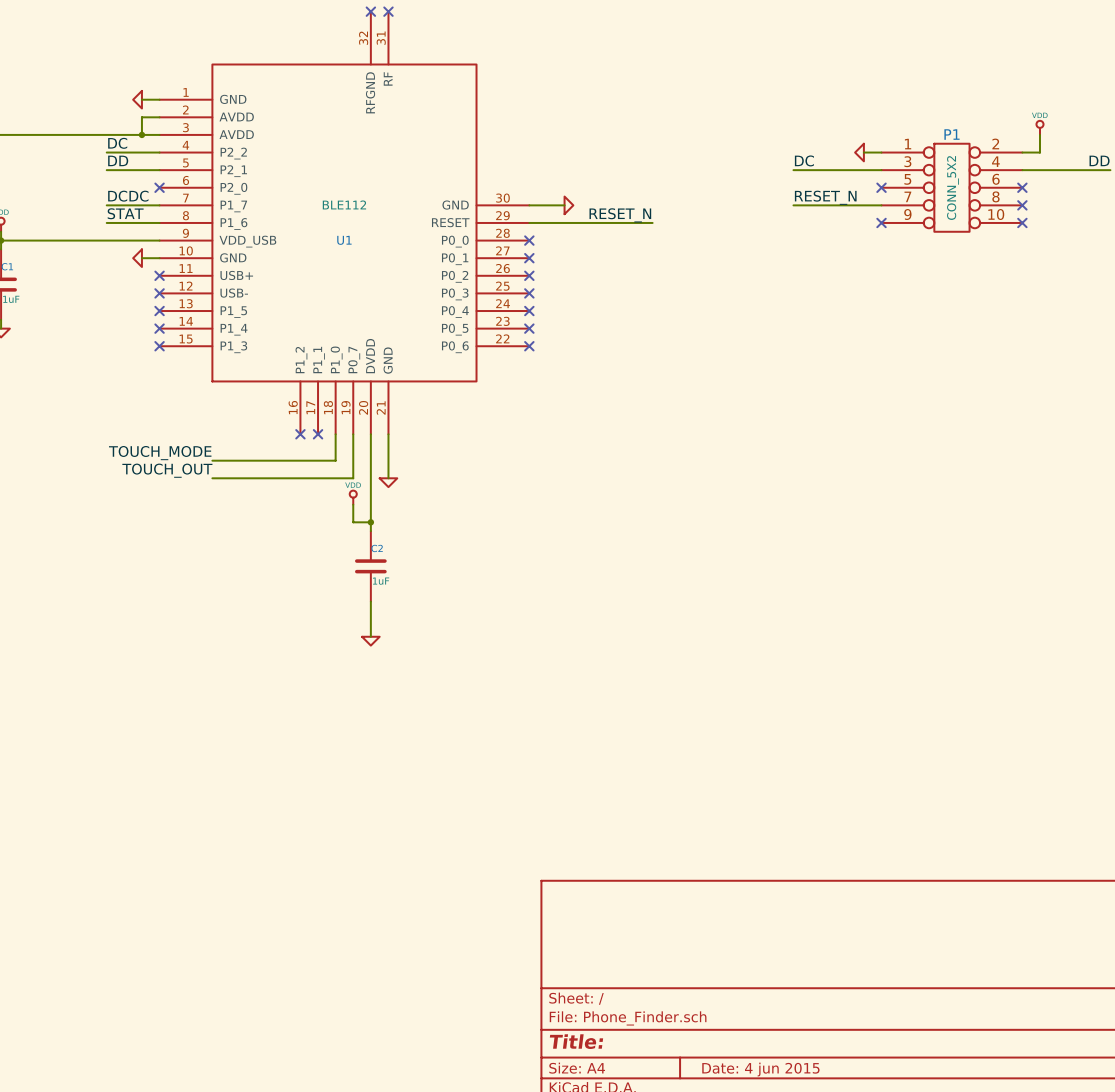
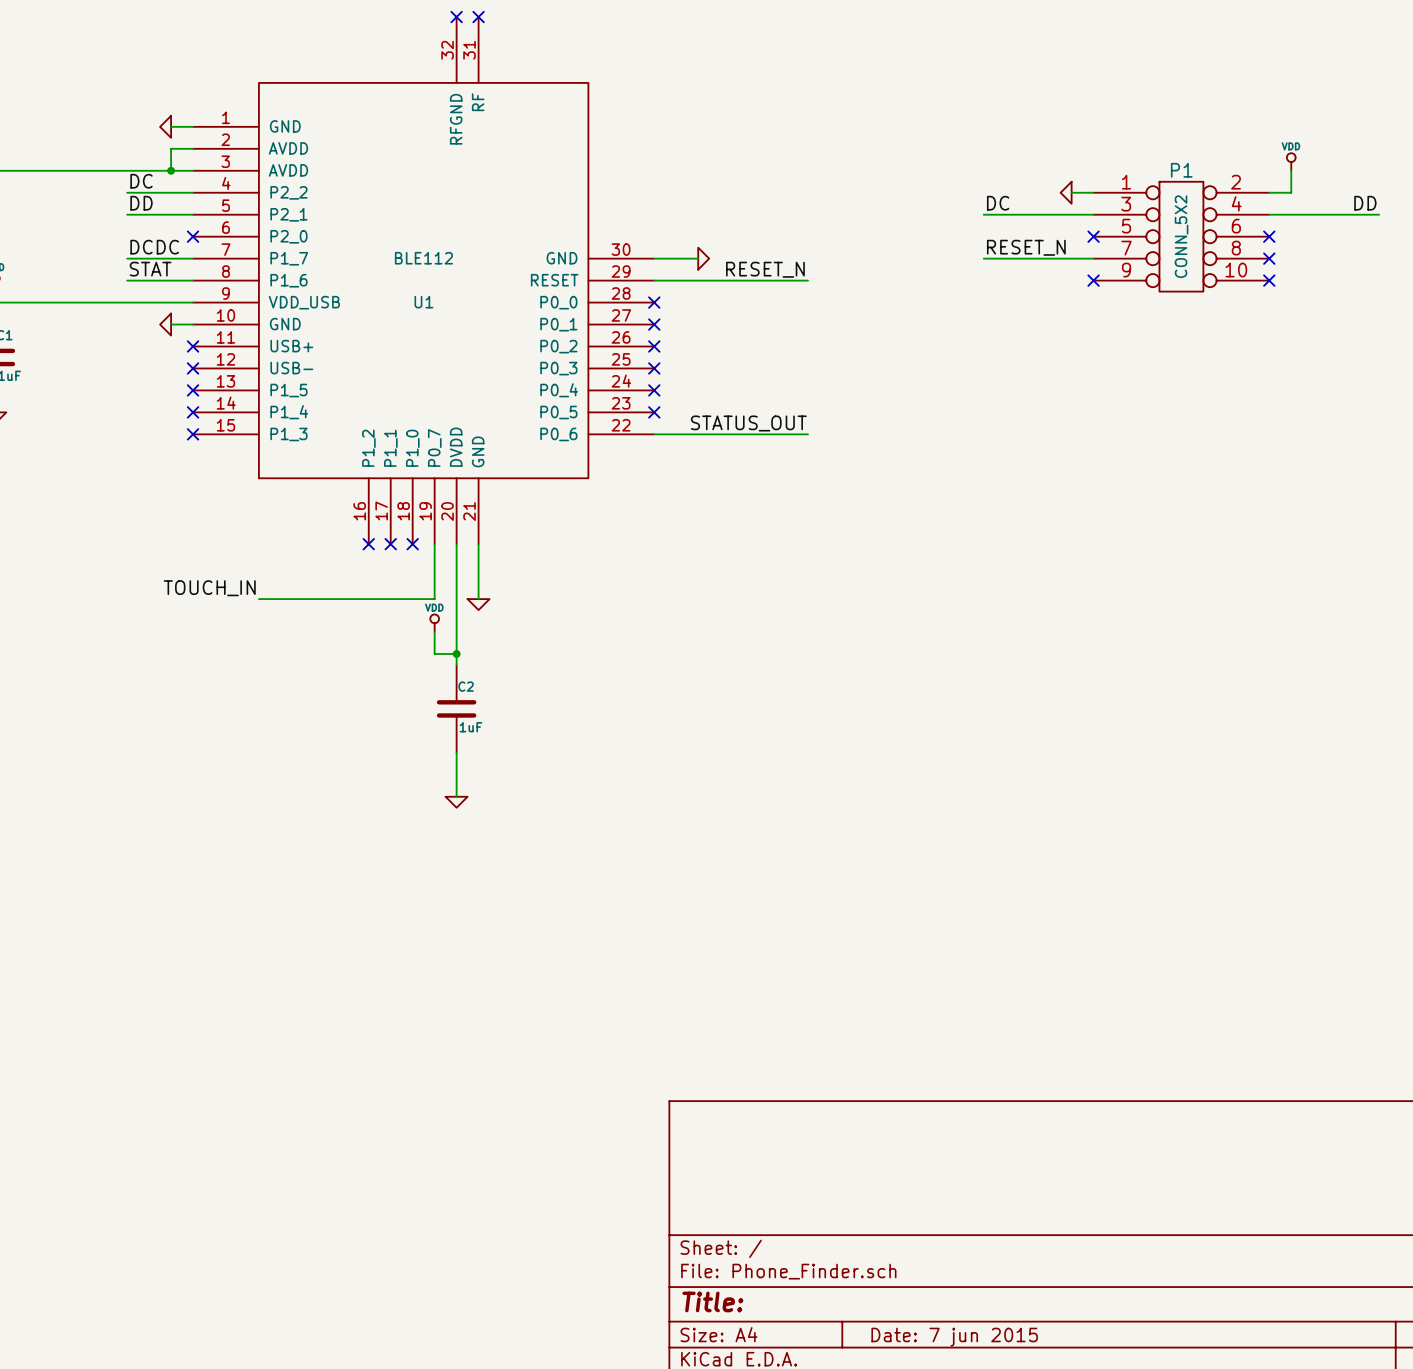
label: none -> STATUS_OUT (748, 423)
wire: none -> (654, 434) (808, 434)
no-connect mark: (529, 346) -> none
wire: (335, 434) (335, 460) (212, 460) -> none
no-connect mark: none -> (412, 544)
label: TOUCH_MODE (160, 453) -> none
label: TOUCH_OUT (167, 470) -> TOUCH_IN (209, 588)
title block: Date: 4 jun 2015 (760, 1069) -> Date: 7 jun 2015 (954, 1337)

